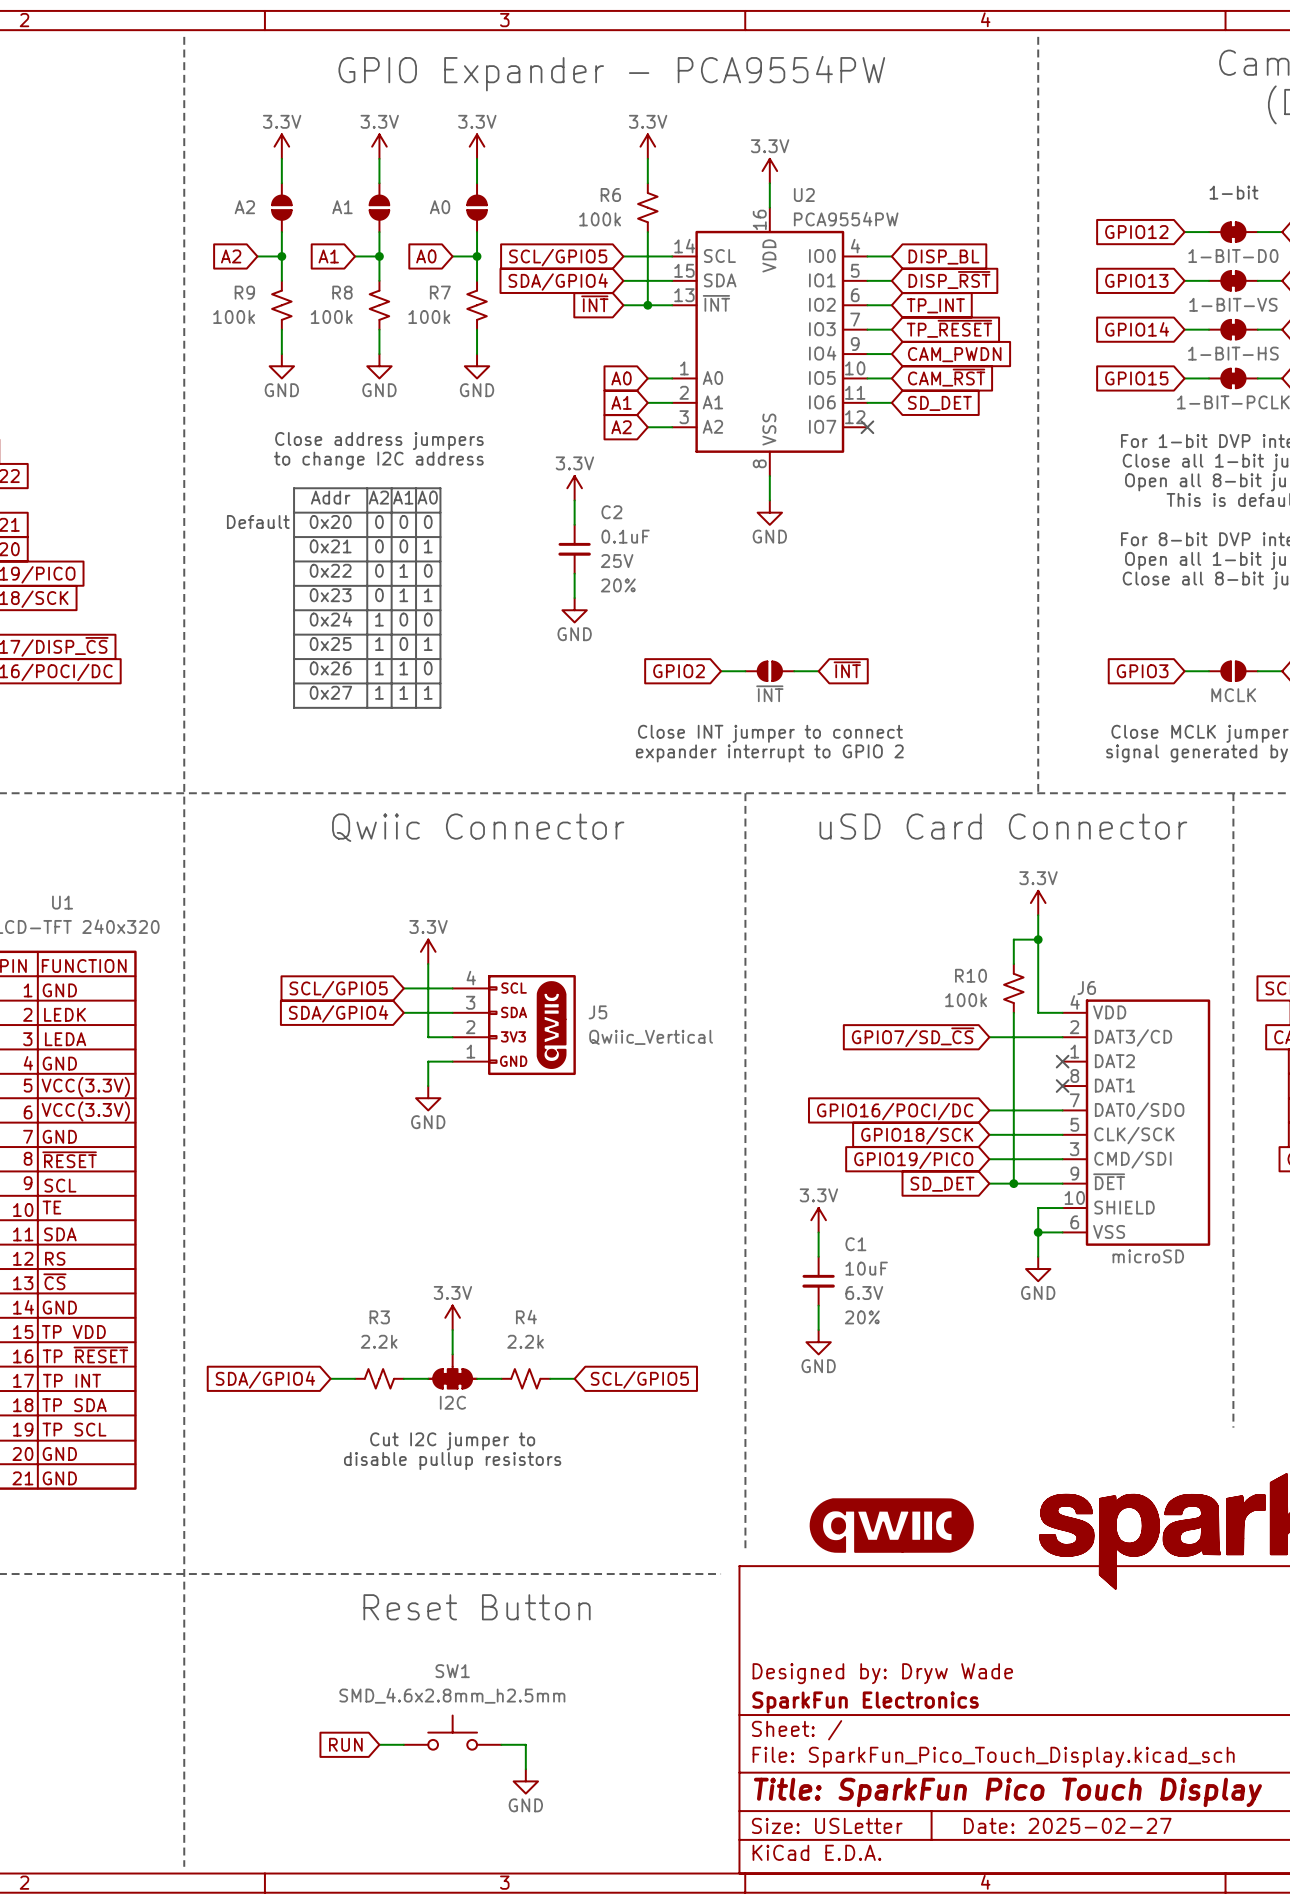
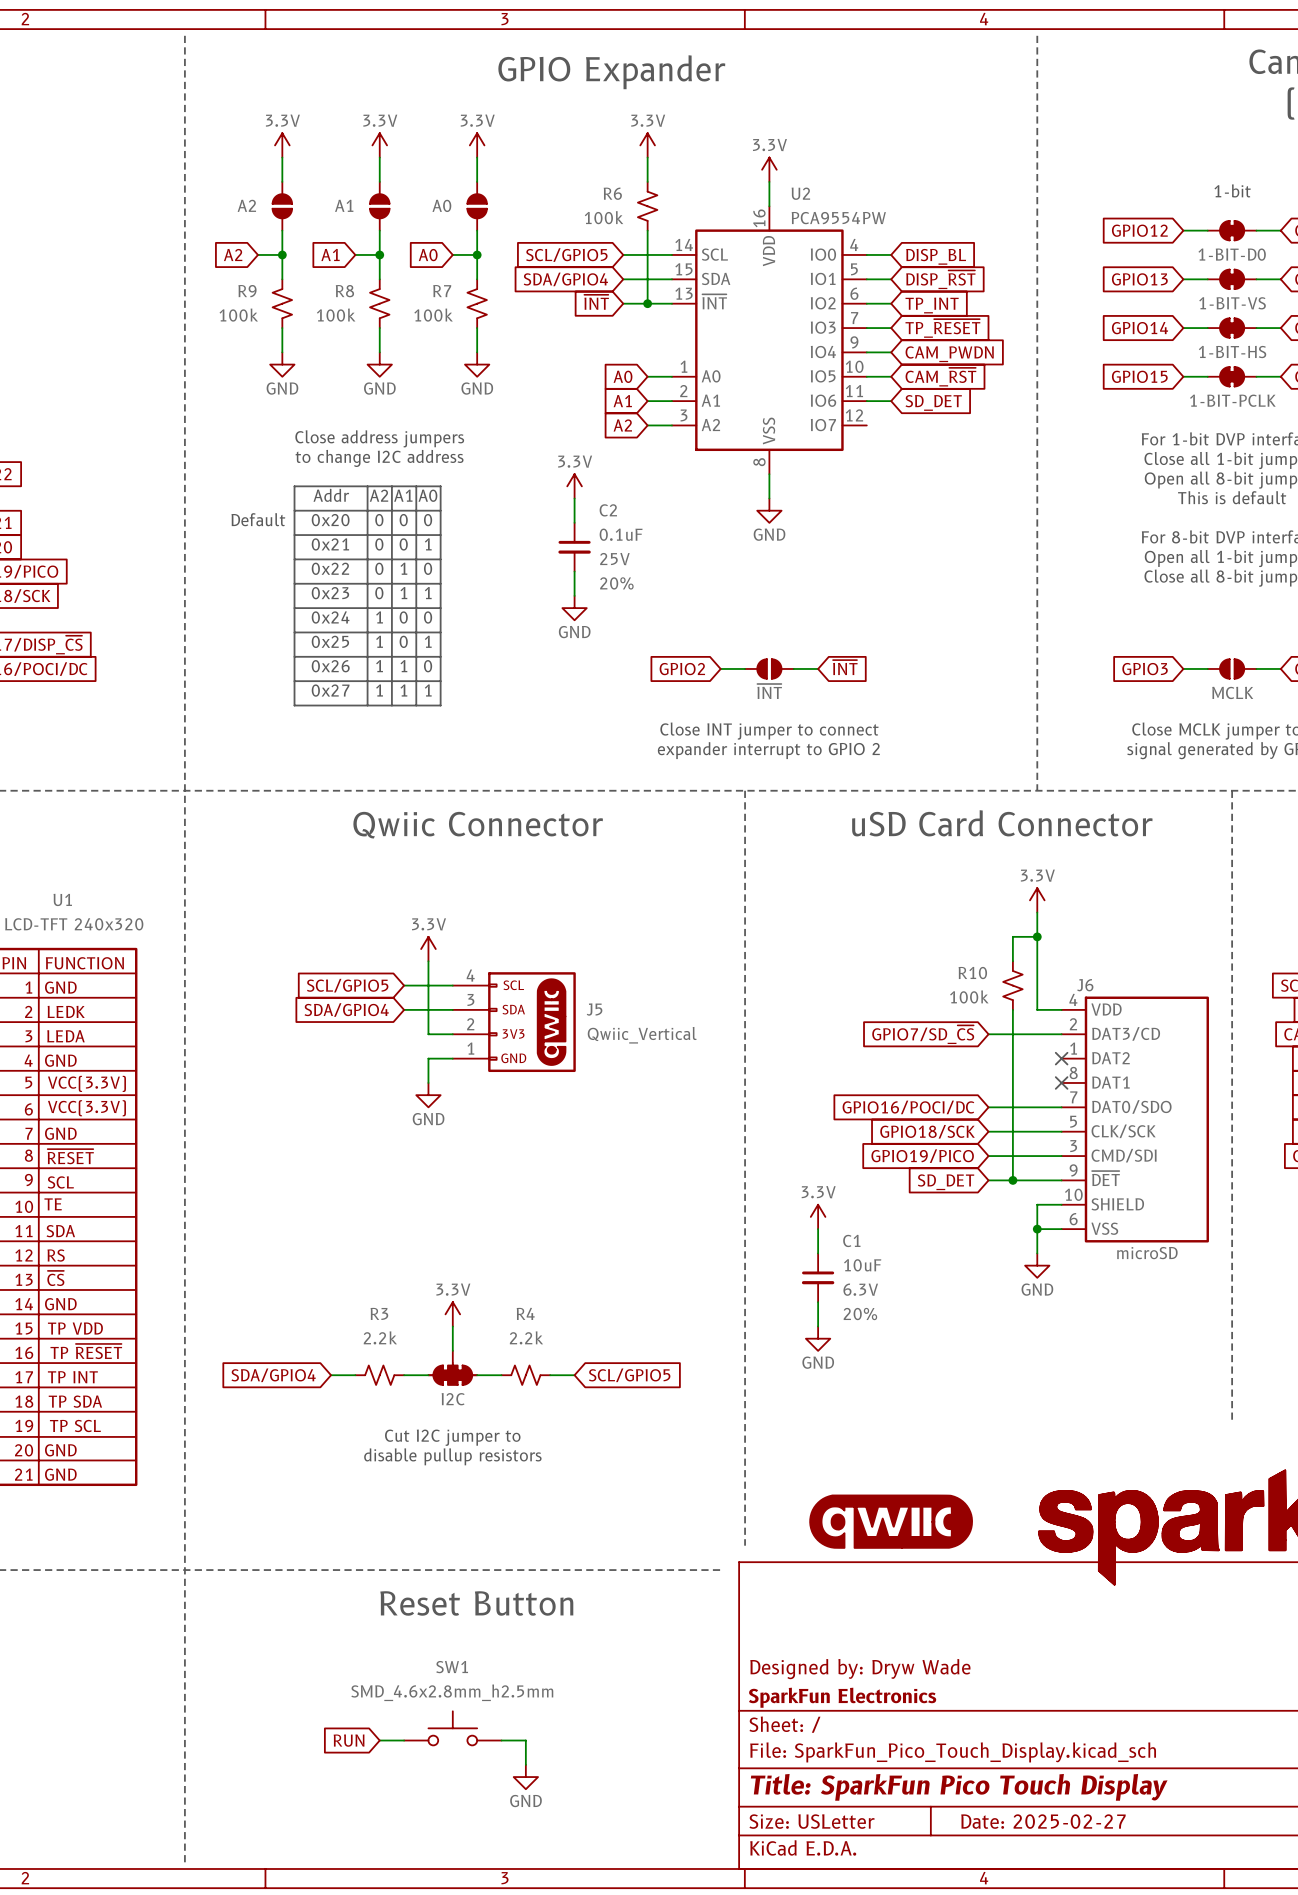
text: GPIO Expander - PCA9554PW (611, 73) -> GPIO Expander (611, 72)
no-connect mark: (867, 427) -> none

